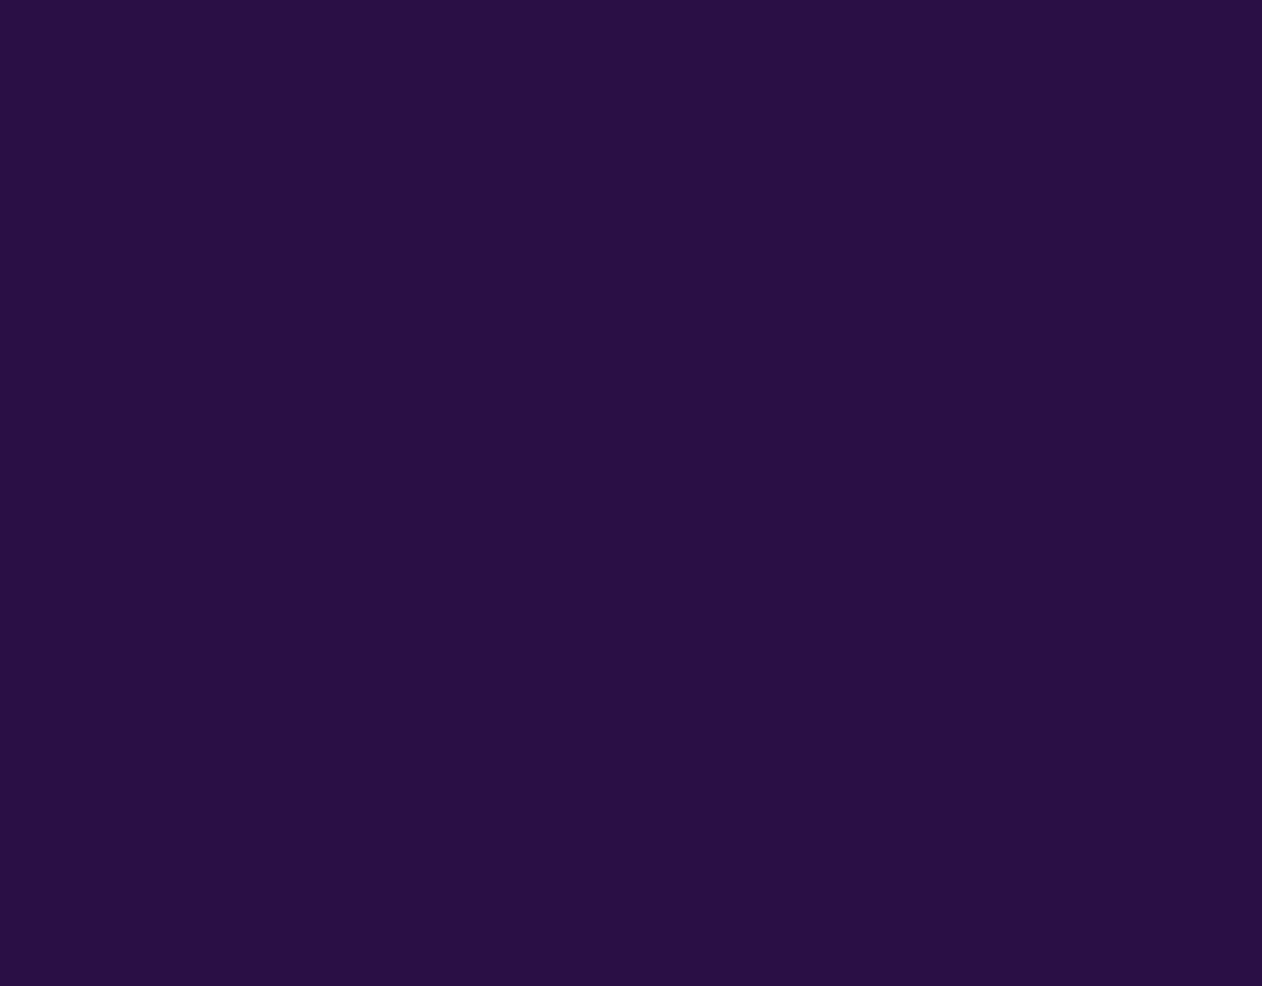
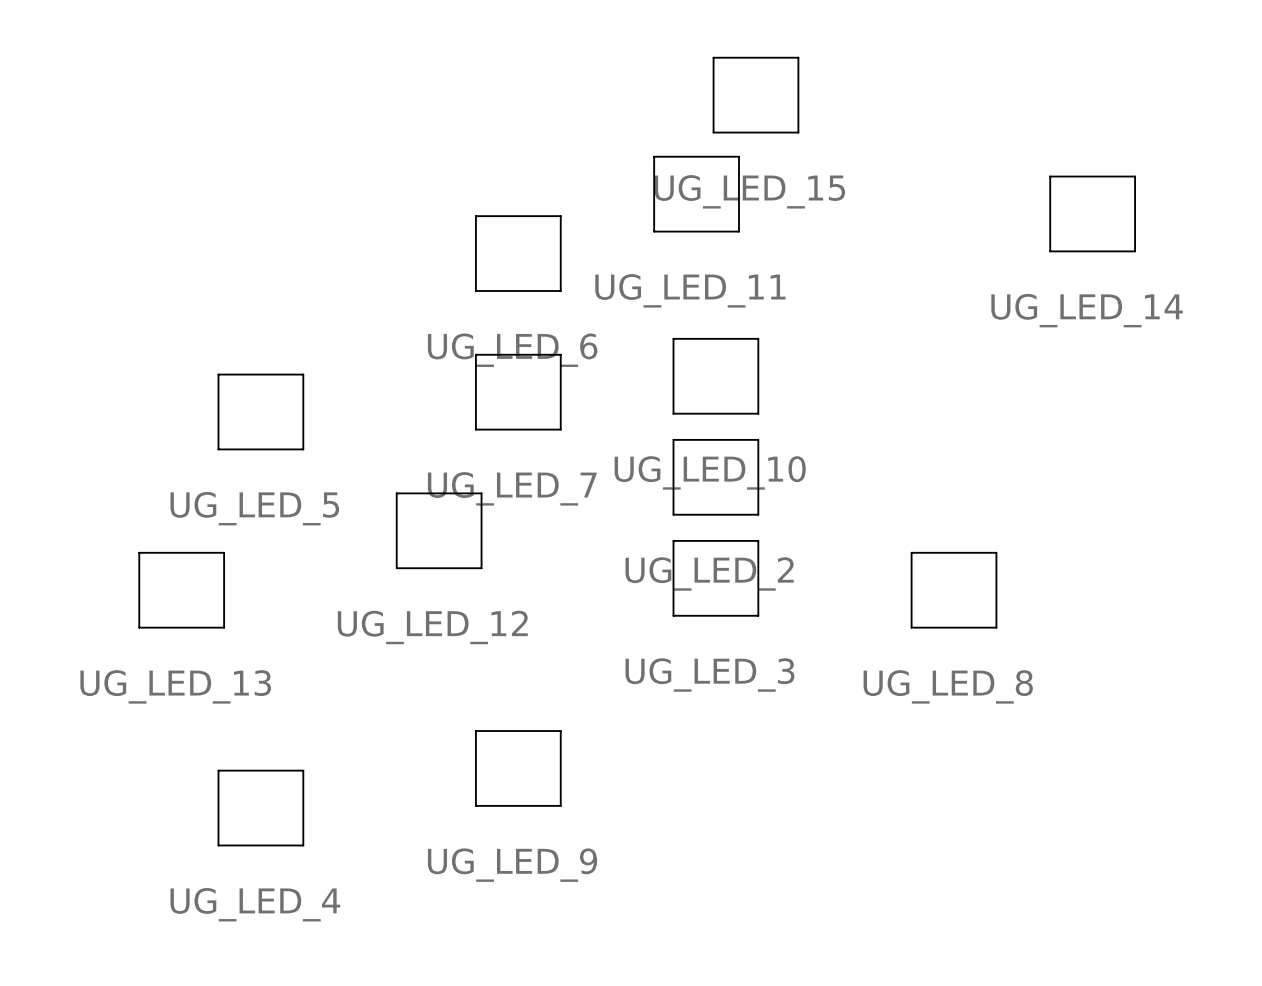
part: none -> UG_LED_15 (755, 95)
part: none -> UG_LED_11 (696, 194)
part: none -> UG_LED_14 (1092, 213)
part: none -> UG_LED_6 (518, 253)
part: none -> UG_LED_10 (715, 376)
part: none -> UG_LED_7 (518, 392)
part: none -> UG_LED_5 (260, 411)
part: none -> UG_LED_2 (715, 477)
part: none -> UG_LED_12 (439, 530)
part: none -> UG_LED_3 (715, 578)
part: none -> UG_LED_13 (181, 590)
part: none -> UG_LED_8 (954, 590)
part: none -> UG_LED_9 (518, 768)
part: none -> UG_LED_4 (260, 808)

